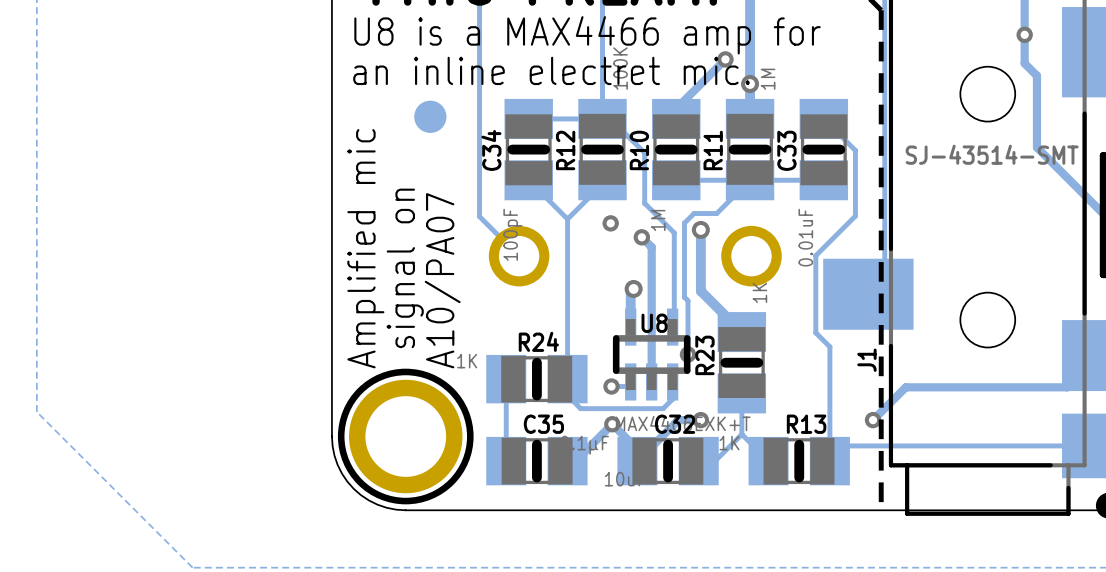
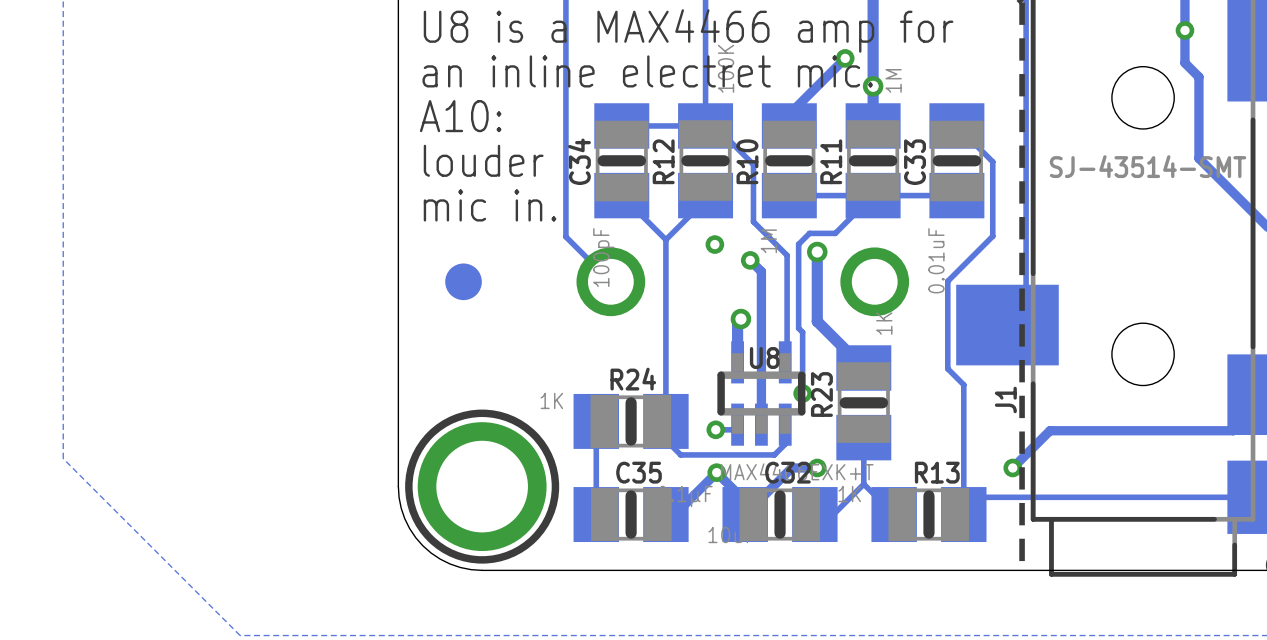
text: none -> A10: (460, 116)
part position: (430, 116) -> (463, 281)
text: none -> louder (483, 160)
text: none -> mic in. (490, 205)
text: Amplified mic (365, 248) -> none
text: signal on (405, 268) -> none
text: A10/PA07 (442, 280) -> none

